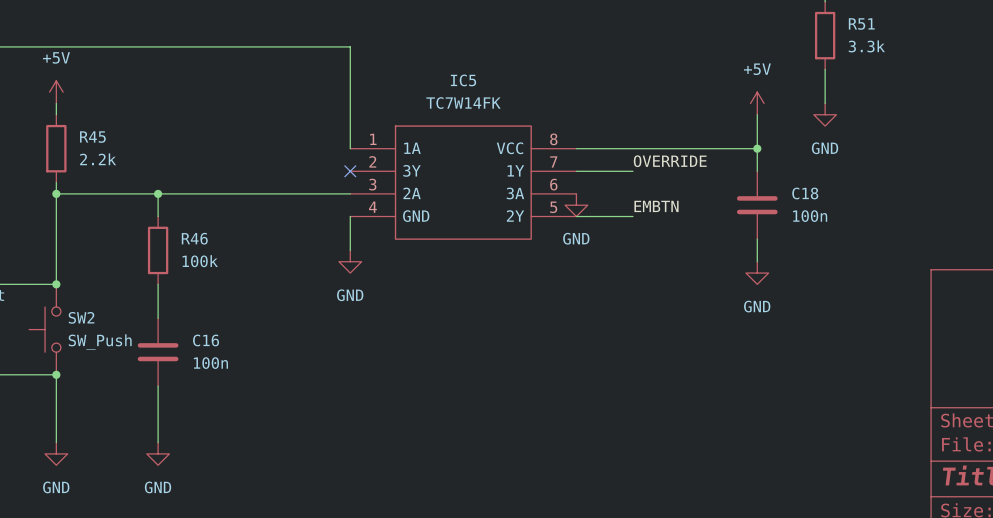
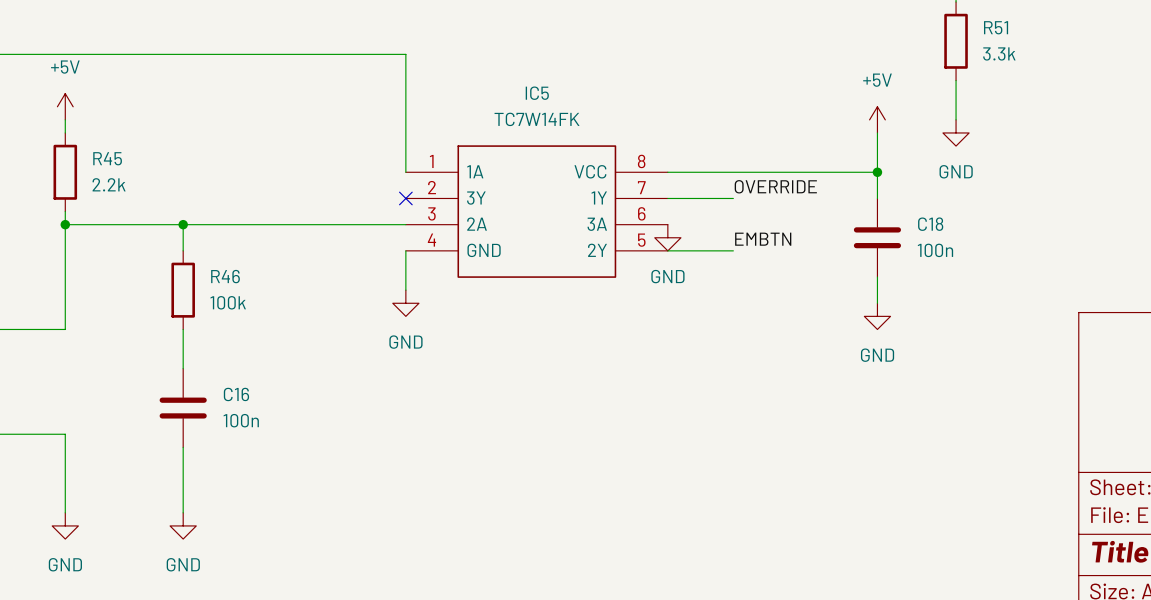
junction: (56, 284) -> none
SW2: SW_Push (45, 329) -> none
junction: (56, 374) -> none

